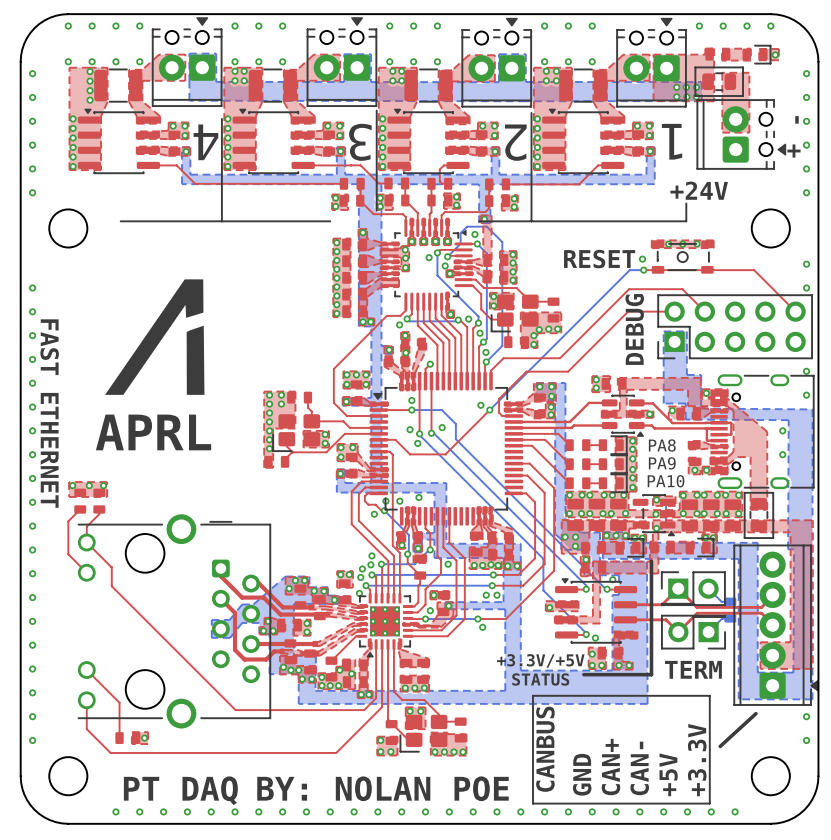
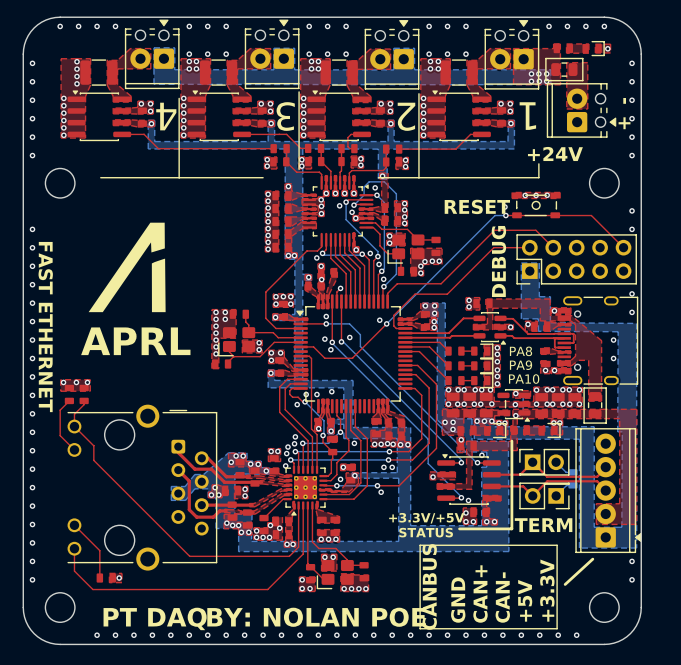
via: (68, 61) -> none
via: (92, 61) -> none
via: (115, 61) -> none
via: (139, 61) -> none

